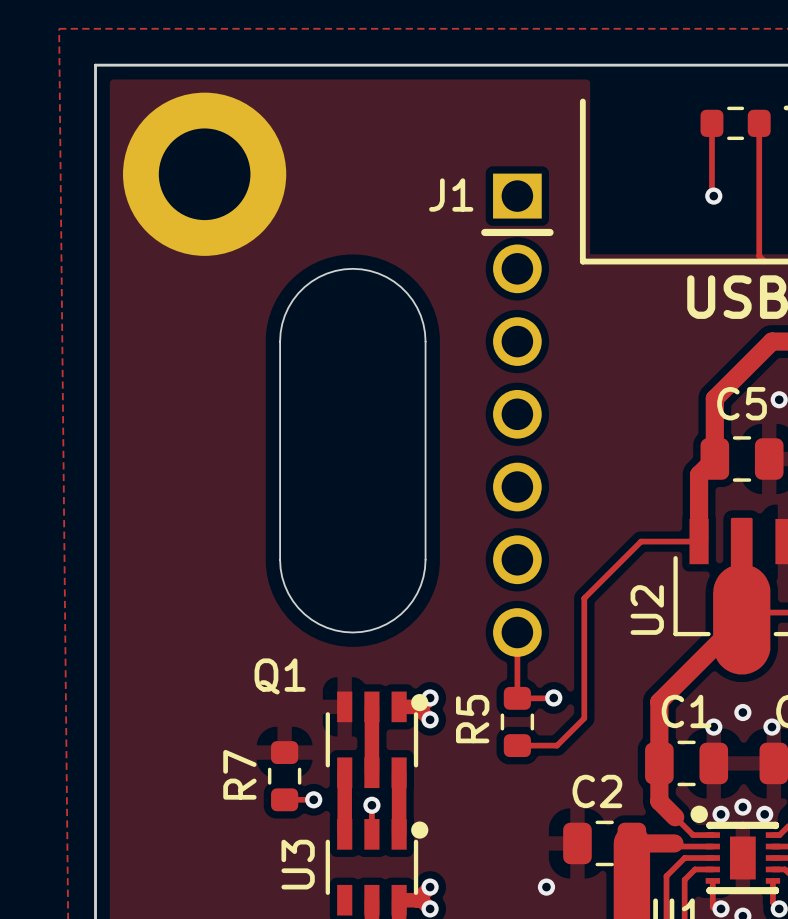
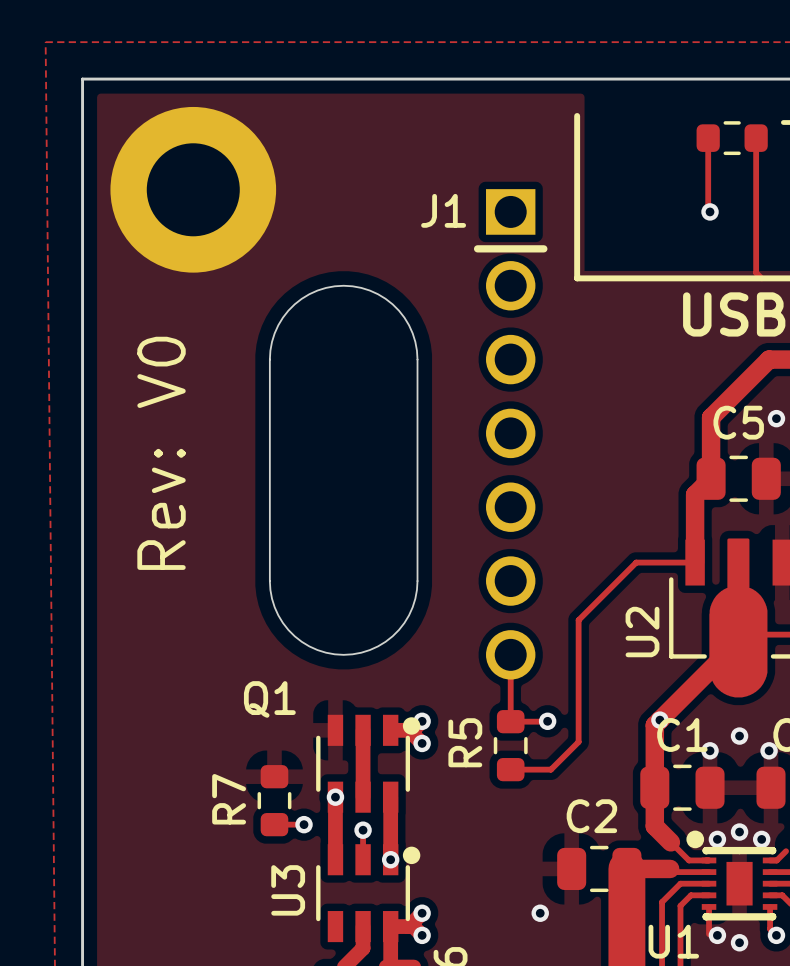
text: none -> Rev: V0 (161, 453)
via: none -> (659, 720)
via: none -> (335, 797)
via: none -> (390, 859)

